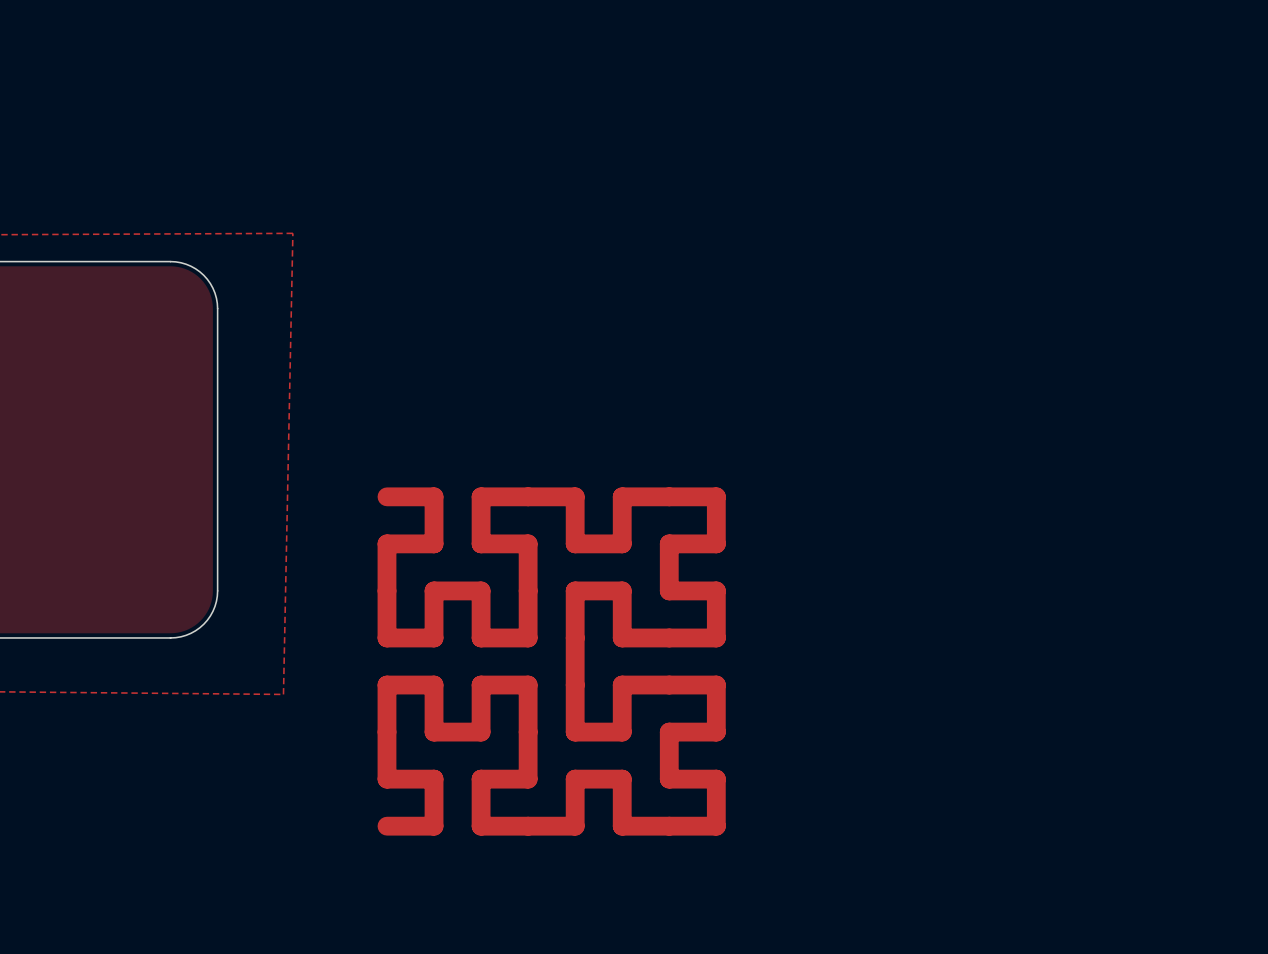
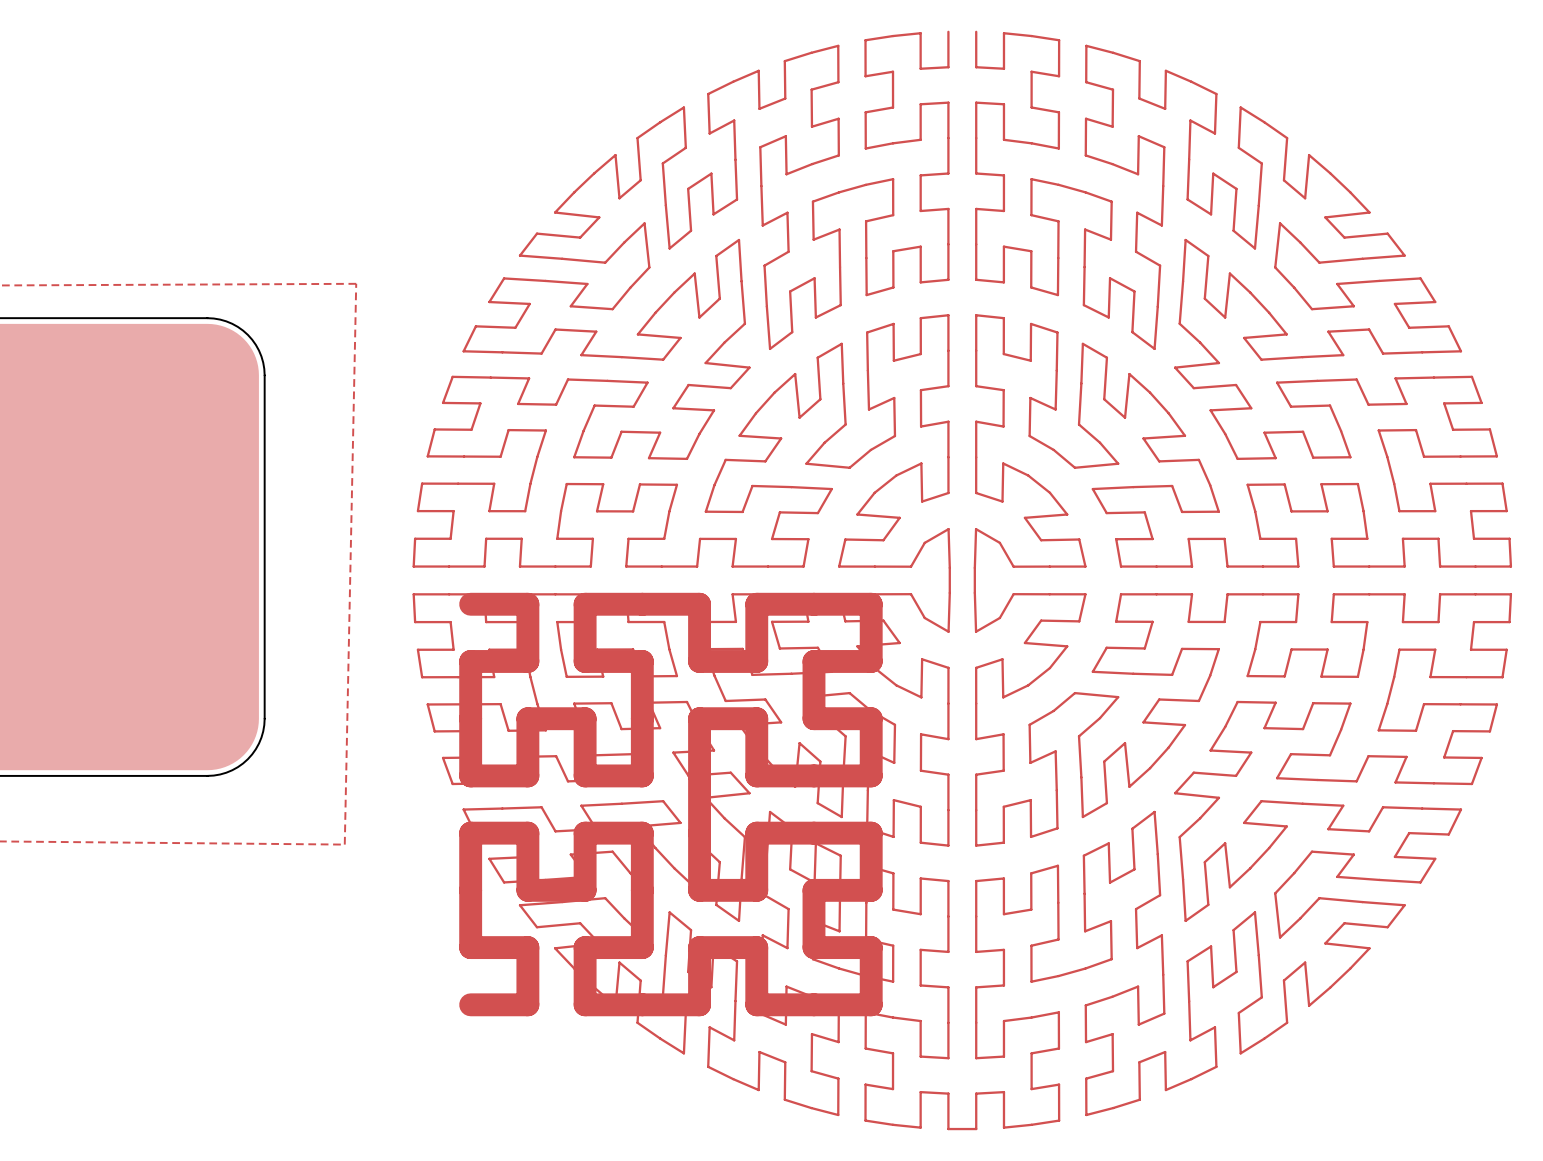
track: none -> (948, 31) (948, 67) (920, 68) (920, 33) (865, 40) (865, 76) (893, 71) (893, 107) (865, 112) (865, 148) (920, 139) (920, 104) (948, 102) (948, 173) (920, 175) (920, 211) (948, 208) (948, 279) (920, 282) (920, 246) (893, 251) (893, 287) (866, 295) (866, 221) (893, 215) (893, 179) (865, 184) (812, 201) (813, 239) (839, 229) (840, 305) (815, 317) (814, 278) (790, 291) (792, 332) (770, 348) (764, 265) (788, 251) (787, 212) (762, 225) (760, 147) (785, 136) (786, 174) (838, 155) (838, 118) (811, 126) (811, 89) (838, 82) (838, 45) (784, 61) (785, 98) (759, 108) (758, 70) (708, 94) (709, 133) (734, 120) (737, 199) (713, 214) (711, 173) (688, 188) (691, 230) (669, 248) (662, 163) (685, 147) (683, 107) (637, 138) (640, 180) (619, 198) (615, 155) (555, 212) (599, 217) (580, 237) (537, 233) (519, 255) (605, 262) (644, 223) (649, 267) (612, 309) (570, 306) (587, 283) (504, 278) (489, 302) (529, 303) (515, 327) (475, 326) (463, 351) (541, 353) (555, 329) (596, 331) (581, 355) (663, 359) (680, 337) (637, 334) (655, 312) (694, 273) (699, 317) (719, 298) (716, 256) (739, 239) (744, 323) (705, 363) (749, 367) (730, 388) (688, 384) (673, 408) (714, 410) (687, 458) (648, 458) (660, 432) (621, 431) (611, 457) (574, 457) (594, 405) (633, 406) (647, 382) (567, 379) (556, 404) (518, 403) (529, 378) (452, 376) (443, 402) (480, 403) (471, 429) (434, 429) (427, 456) (500, 456) (508, 430) (545, 430) (530, 483) (525, 511) (489, 511) (494, 483) (422, 483) (417, 511) (453, 511) (450, 538) (415, 538) (413, 566) (484, 566) (486, 538) (521, 538) (519, 566) (590, 566) (592, 538) (557, 538) (566, 484) (603, 484) (597, 511) (633, 511) (639, 484) (676, 484) (664, 538) (628, 538) (626, 566) (697, 566) (700, 538) (735, 538) (732, 566) (803, 566) (808, 539) (772, 539) (779, 512) (817, 513) (831, 489) (752, 485) (742, 511) (705, 511) (725, 459) (765, 461) (781, 438) (739, 435) (774, 392) (795, 374) (799, 417) (820, 399) (817, 357) (841, 343) (845, 424) (824, 442) (806, 463) (849, 467) (870, 449) (894, 436) (894, 397) (868, 409) (867, 332) (893, 323) (893, 360) (920, 354) (920, 318) (948, 315) (948, 386) (920, 390) (921, 426) (948, 421) (948, 493) (922, 501) (921, 463) (896, 475) (874, 492) (857, 514) (899, 517) (883, 540) (845, 539) (839, 566) (911, 566) (924, 542) (948, 529) (948, 631) (924, 617) (911, 594) (839, 594) (845, 621) (883, 620) (899, 643) (857, 646) (874, 668) (896, 685) (921, 697) (922, 659) (948, 667) (948, 739) (921, 734) (920, 770) (948, 774) (948, 845) (920, 842) (920, 806) (893, 800) (893, 836) (867, 828) (868, 751) (894, 762) (894, 724) (870, 710) (849, 693) (806, 697) (824, 718) (845, 736) (841, 817) (817, 803) (820, 761) (799, 743) (795, 786) (774, 768) (739, 725) (781, 722) (765, 699) (725, 700) (705, 649) (742, 648) (752, 674) (831, 671) (817, 647) (779, 648) (772, 621) (808, 621) (803, 594) (732, 594) (735, 621) (700, 621) (697, 594) (626, 594) (628, 622) (664, 622) (676, 676) (639, 676) (633, 649) (597, 649) (603, 676) (566, 676) (557, 622) (592, 622) (590, 594) (519, 594) (521, 622) (486, 622) (484, 594) (413, 594) (415, 622) (450, 622) (453, 649) (417, 649) (422, 677) (494, 677) (489, 649) (525, 649) (530, 676) (545, 730) (508, 730) (500, 704) (427, 704) (434, 731) (471, 731) (480, 757) (443, 757) (452, 784) (529, 782) (518, 756) (556, 756) (567, 781) (647, 778) (633, 754) (594, 755) (574, 703) (611, 703) (621, 729) (660, 728) (648, 702) (687, 701) (714, 750) (673, 752) (688, 775) (730, 772) (749, 793) (705, 797) (744, 837) (739, 920) (716, 904) (719, 862) (699, 843) (694, 887) (655, 848) (637, 826) (680, 822) (663, 801) (581, 805) (596, 829) (555, 831) (541, 807) (463, 809) (475, 834) (515, 833) (529, 856) (489, 858) (504, 882) (587, 876) (570, 854) (612, 851) (649, 893) (644, 937) (605, 898) (519, 905) (537, 927) (580, 923) (599, 943) (555, 948) (615, 1005) (619, 962) (640, 980) (637, 1022) (683, 1053) (685, 1013) (662, 997) (669, 912) (691, 930) (688, 971) (711, 987) (713, 946) (737, 961) (734, 1040) (709, 1027) (708, 1066) (758, 1090) (759, 1052) (785, 1062) (784, 1099) (838, 1115) (838, 1078) (811, 1071) (811, 1034) (838, 1042) (838, 1005) (786, 986) (785, 1024) (760, 1013) (762, 935) (787, 948) (788, 909) (764, 895) (770, 811) (792, 828) (790, 869) (814, 882) (815, 843) (840, 855) (839, 931) (813, 921) (812, 959) (865, 976) (893, 981) (893, 945) (866, 939) (866, 865) (893, 873) (893, 909) (920, 914) (920, 878) (948, 881) (948, 951) (920, 949) (920, 985) (948, 987) (948, 1058) (920, 1056) (920, 1021) (865, 1012) (865, 1048) (893, 1053) (893, 1089) (865, 1084) (865, 1120) (920, 1127) (920, 1092) (948, 1093) (948, 1129) (976, 1129) (976, 1093) (1003, 1092) (1003, 1127) (1059, 1120) (1059, 1084) (1031, 1089) (1031, 1053) (1058, 1048) (1058, 1012) (1003, 1021) (1003, 1056) (976, 1058) (976, 987) (1003, 985) (1003, 949) (976, 951) (976, 881) (1003, 878) (1003, 914) (1031, 909) (1031, 873) (1057, 865) (1058, 939) (1031, 945) (1031, 981) (1058, 976) (1111, 959) (1110, 921) (1085, 931) (1083, 855) (1108, 843) (1110, 882) (1134, 869) (1132, 828) (1154, 811) (1160, 895) (1136, 909) (1137, 948) (1161, 935) (1164, 1013) (1138, 1024) (1138, 986) (1085, 1005) (1086, 1042) (1112, 1034) (1113, 1071) (1086, 1078) (1086, 1115) (1139, 1099) (1139, 1062) (1165, 1052) (1165, 1090) (1216, 1066) (1214, 1027) (1190, 1040) (1187, 961) (1211, 946) (1213, 987) (1236, 971) (1233, 930) (1254, 912) (1261, 997) (1238, 1013) (1240, 1053) (1287, 1022) (1283, 980) (1305, 962) (1309, 1005) (1369, 948) (1325, 943) (1344, 923) (1387, 927) (1404, 905) (1319, 898) (1280, 937) (1275, 893) (1312, 851) (1353, 854) (1337, 876) (1420, 882) (1435, 858) (1394, 856) (1409, 833) (1448, 834) (1460, 809) (1383, 807) (1369, 831) (1328, 829) (1343, 805) (1261, 801) (1244, 822) (1286, 826) (1269, 848) (1229, 887) (1225, 843) (1204, 862) (1208, 904) (1185, 920) (1179, 837) (1218, 797) (1175, 793) (1193, 772) (1236, 775) (1251, 752) (1210, 750) (1237, 701) (1275, 702) (1264, 728) (1303, 729) (1313, 703) (1350, 703) (1330, 755) (1290, 754) (1277, 778) (1356, 781) (1368, 756) (1406, 756) (1395, 782) (1471, 784) (1481, 757) (1444, 757) (1453, 731) (1489, 731) (1496, 704) (1424, 704) (1416, 730) (1378, 730) (1394, 676) (1399, 649) (1435, 649) (1430, 677) (1502, 677) (1506, 649) (1471, 649) (1474, 622) (1509, 622) (1510, 594) (1440, 594) (1438, 622) (1402, 622) (1404, 594) (1333, 594) (1331, 622) (1367, 622) (1357, 676) (1321, 676) (1327, 649) (1291, 649) (1284, 676) (1247, 676) (1260, 622) (1296, 622) (1298, 594) (1227, 594) (1224, 621) (1188, 621) (1192, 594) (1121, 594) (1116, 621) (1152, 621) (1144, 648) (1106, 647) (1092, 671) (1172, 674) (1182, 648) (1218, 649) (1198, 700) (1159, 699) (1143, 722) (1185, 725) (1150, 768) (1129, 786) (1125, 743) (1104, 761) (1106, 803) (1082, 817) (1079, 736) (1100, 718) (1118, 697) (1074, 693) (1053, 710) (1029, 724) (1030, 762) (1055, 751) (1057, 828) (1031, 836) (1030, 800) (1003, 806) (1003, 842) (976, 845) (976, 774) (1003, 770) (1003, 734) (976, 739) (976, 667) (1002, 659) (1003, 697) (1028, 685) (1049, 668) (1067, 646) (1024, 643) (1041, 620) (1079, 621) (1085, 594) (1013, 594) (999, 617) (976, 631) (976, 529) (999, 542) (1013, 566) (1085, 566) (1079, 539) (1041, 540) (1024, 517) (1067, 514) (1049, 492) (1028, 475) (1003, 463) (1002, 501) (976, 493) (976, 421) (1003, 426) (1003, 390) (976, 386) (976, 315) (1003, 318) (1003, 354) (1030, 360) (1031, 323) (1057, 332) (1055, 409) (1030, 397) (1029, 436) (1053, 449) (1074, 467) (1118, 463) (1100, 442) (1079, 424) (1082, 343) (1106, 357) (1104, 399) (1125, 417) (1129, 374) (1150, 392) (1185, 435) (1143, 438) (1159, 461) (1198, 459) (1218, 511) (1182, 511) (1172, 485) (1092, 489) (1106, 513) (1144, 512) (1152, 539) (1116, 539) (1121, 566) (1192, 566) (1188, 538) (1224, 538) (1227, 566) (1298, 566) (1296, 538) (1260, 538) (1247, 484) (1284, 484) (1291, 511) (1327, 511) (1321, 484) (1357, 484) (1367, 538) (1331, 538) (1333, 566) (1404, 566) (1402, 538) (1438, 538) (1440, 566) (1510, 566) (1509, 538) (1474, 538) (1471, 511) (1506, 511) (1502, 483) (1430, 483) (1435, 511) (1399, 511) (1394, 483) (1378, 430) (1416, 430) (1424, 456) (1496, 456) (1489, 429) (1453, 429) (1444, 403) (1481, 402) (1471, 376) (1395, 378) (1406, 403) (1368, 404) (1356, 379) (1277, 382) (1290, 406) (1330, 405) (1350, 457) (1313, 457) (1303, 431) (1264, 432) (1275, 458) (1237, 458) (1210, 410) (1251, 408) (1236, 384) (1193, 388) (1175, 367) (1218, 363) (1179, 323) (1185, 239) (1208, 256) (1204, 298) (1225, 317) (1229, 273) (1269, 312) (1286, 334) (1244, 337) (1261, 359) (1343, 355) (1328, 331) (1369, 329) (1383, 353) (1460, 351) (1448, 326) (1409, 327) (1394, 303) (1435, 302) (1420, 278) (1337, 283) (1353, 306) (1312, 309) (1275, 267) (1280, 223) (1319, 262) (1404, 255) (1387, 233) (1344, 237) (1325, 217) (1369, 212) (1309, 155) (1305, 198) (1283, 180) (1287, 138) (1240, 107) (1238, 147) (1261, 163) (1254, 248) (1233, 230) (1236, 188) (1213, 173) (1211, 214) (1187, 199) (1190, 120) (1214, 133) (1216, 94) (1165, 70) (1165, 108) (1139, 98) (1139, 61) (1086, 45) (1086, 82) (1113, 89) (1112, 126) (1086, 118) (1085, 155) (1138, 174) (1138, 136) (1164, 147) (1161, 225) (1137, 212) (1136, 251) (1160, 265) (1154, 348) (1132, 332) (1134, 291) (1110, 278) (1108, 317) (1083, 305) (1085, 229) (1110, 239) (1111, 201) (1058, 184) (1031, 179) (1031, 215) (1058, 221) (1057, 295) (1031, 287) (1031, 251) (1003, 246) (1003, 282) (976, 279) (976, 208) (1003, 211) (1003, 175) (976, 173) (976, 102) (1003, 104) (1003, 139) (1058, 148) (1058, 112) (1031, 107) (1031, 71) (1059, 76) (1059, 40) (1003, 33) (1003, 68) (976, 67) (976, 31)

